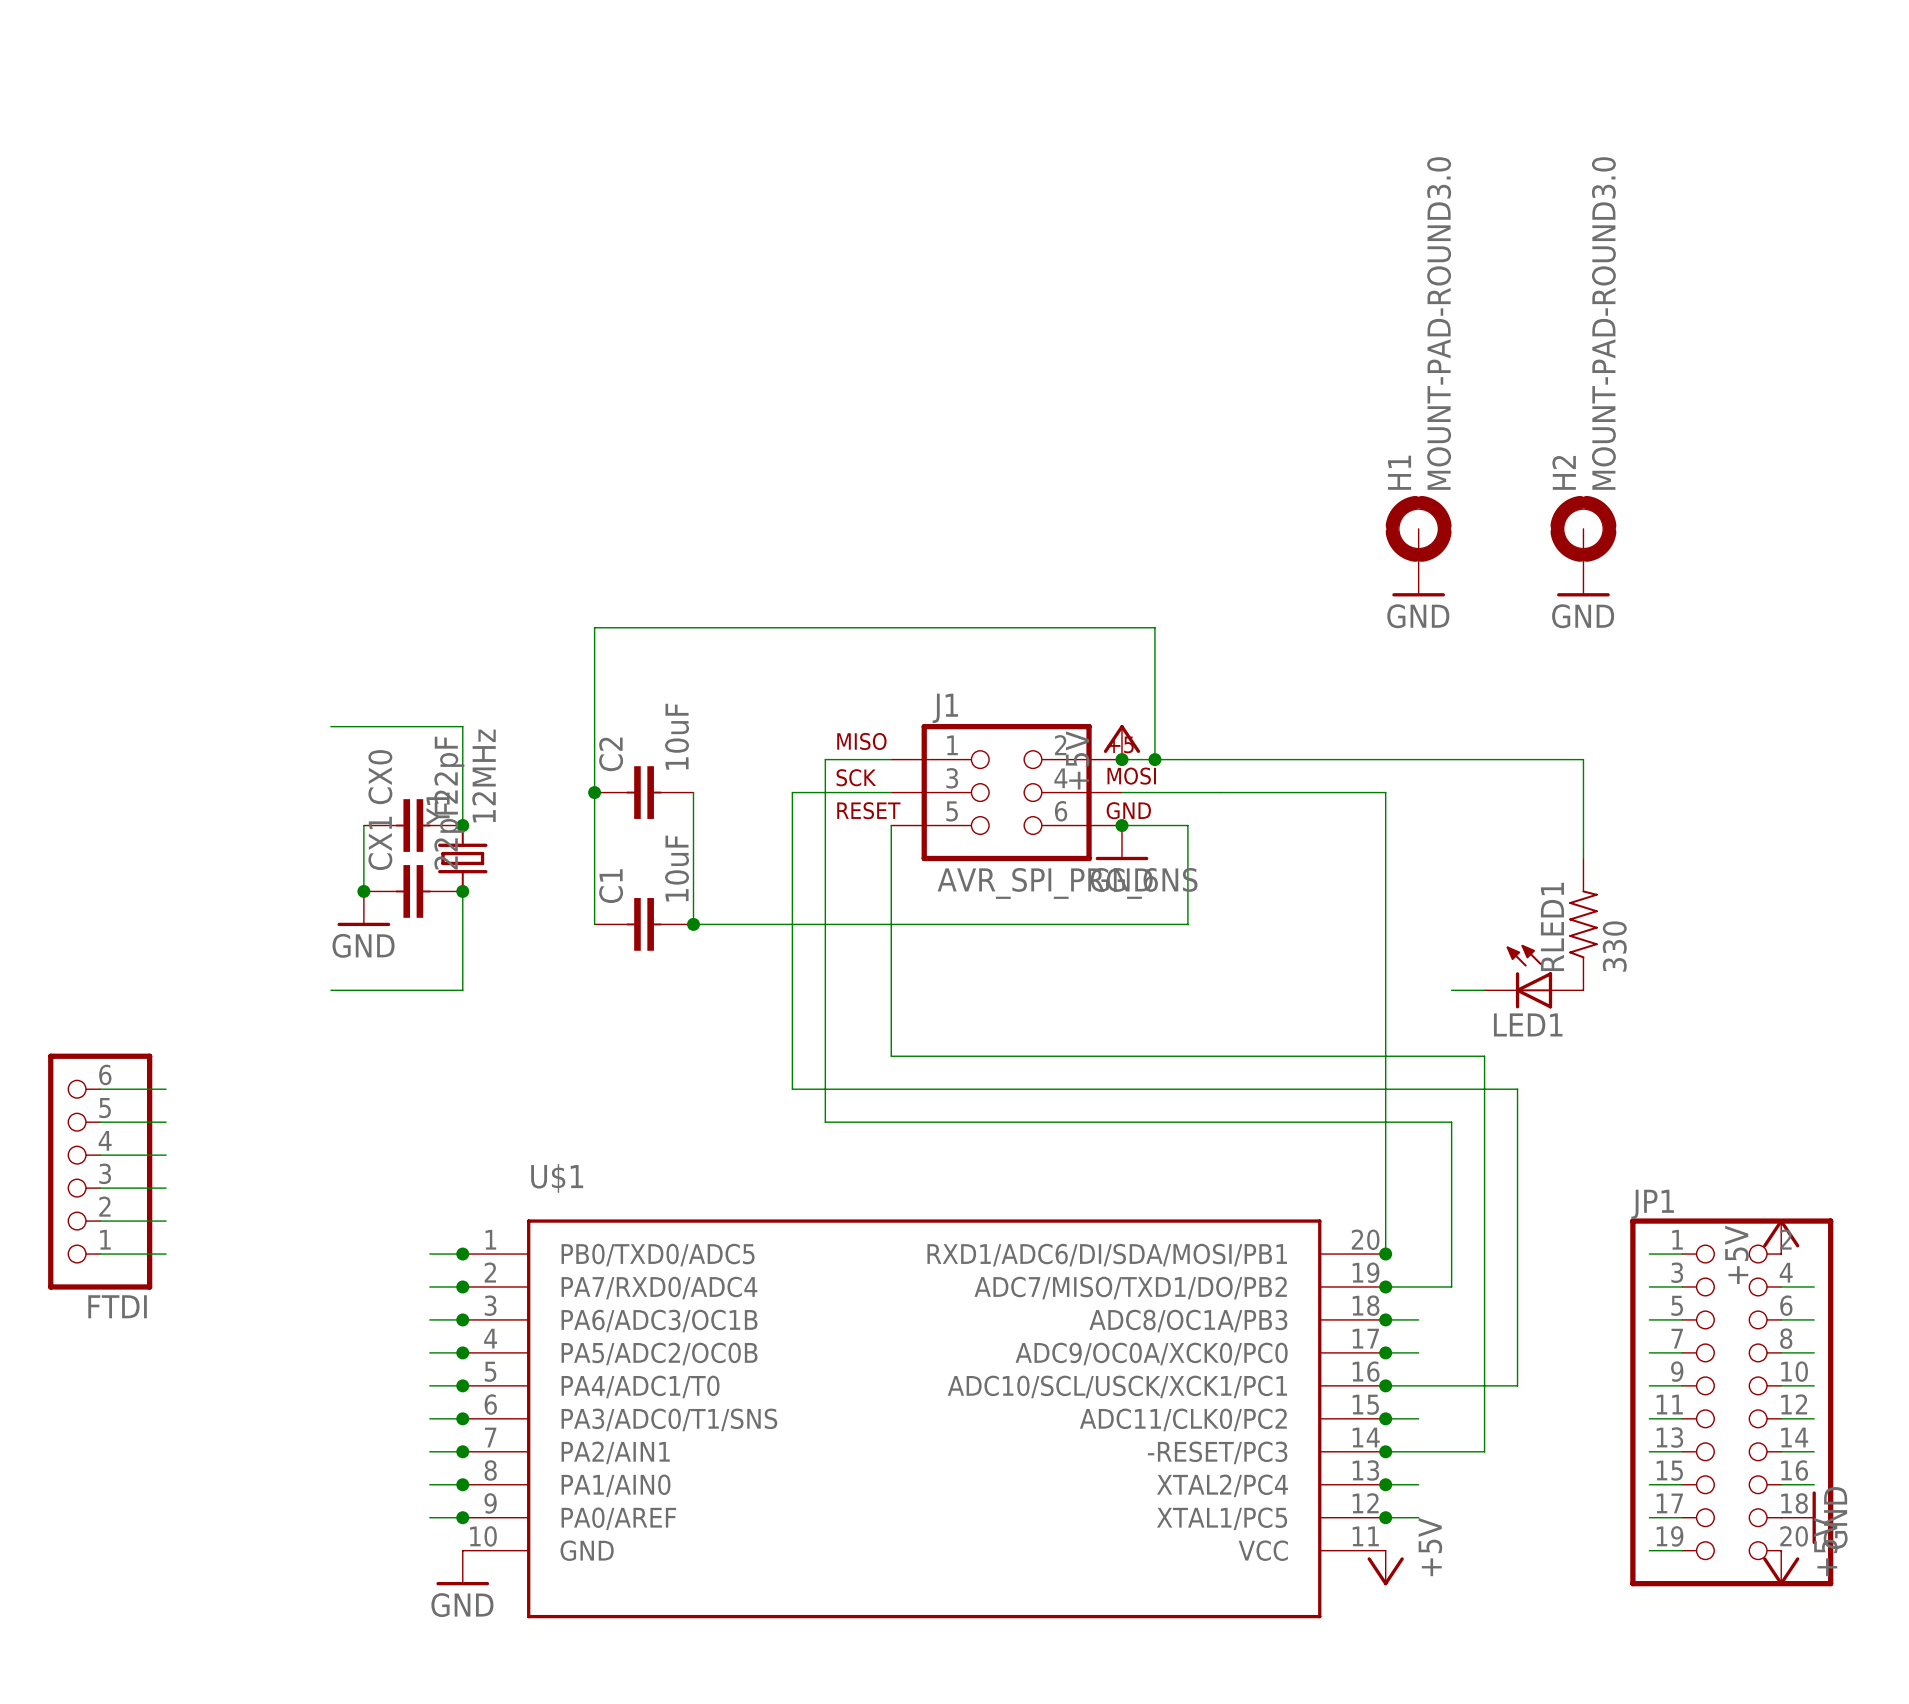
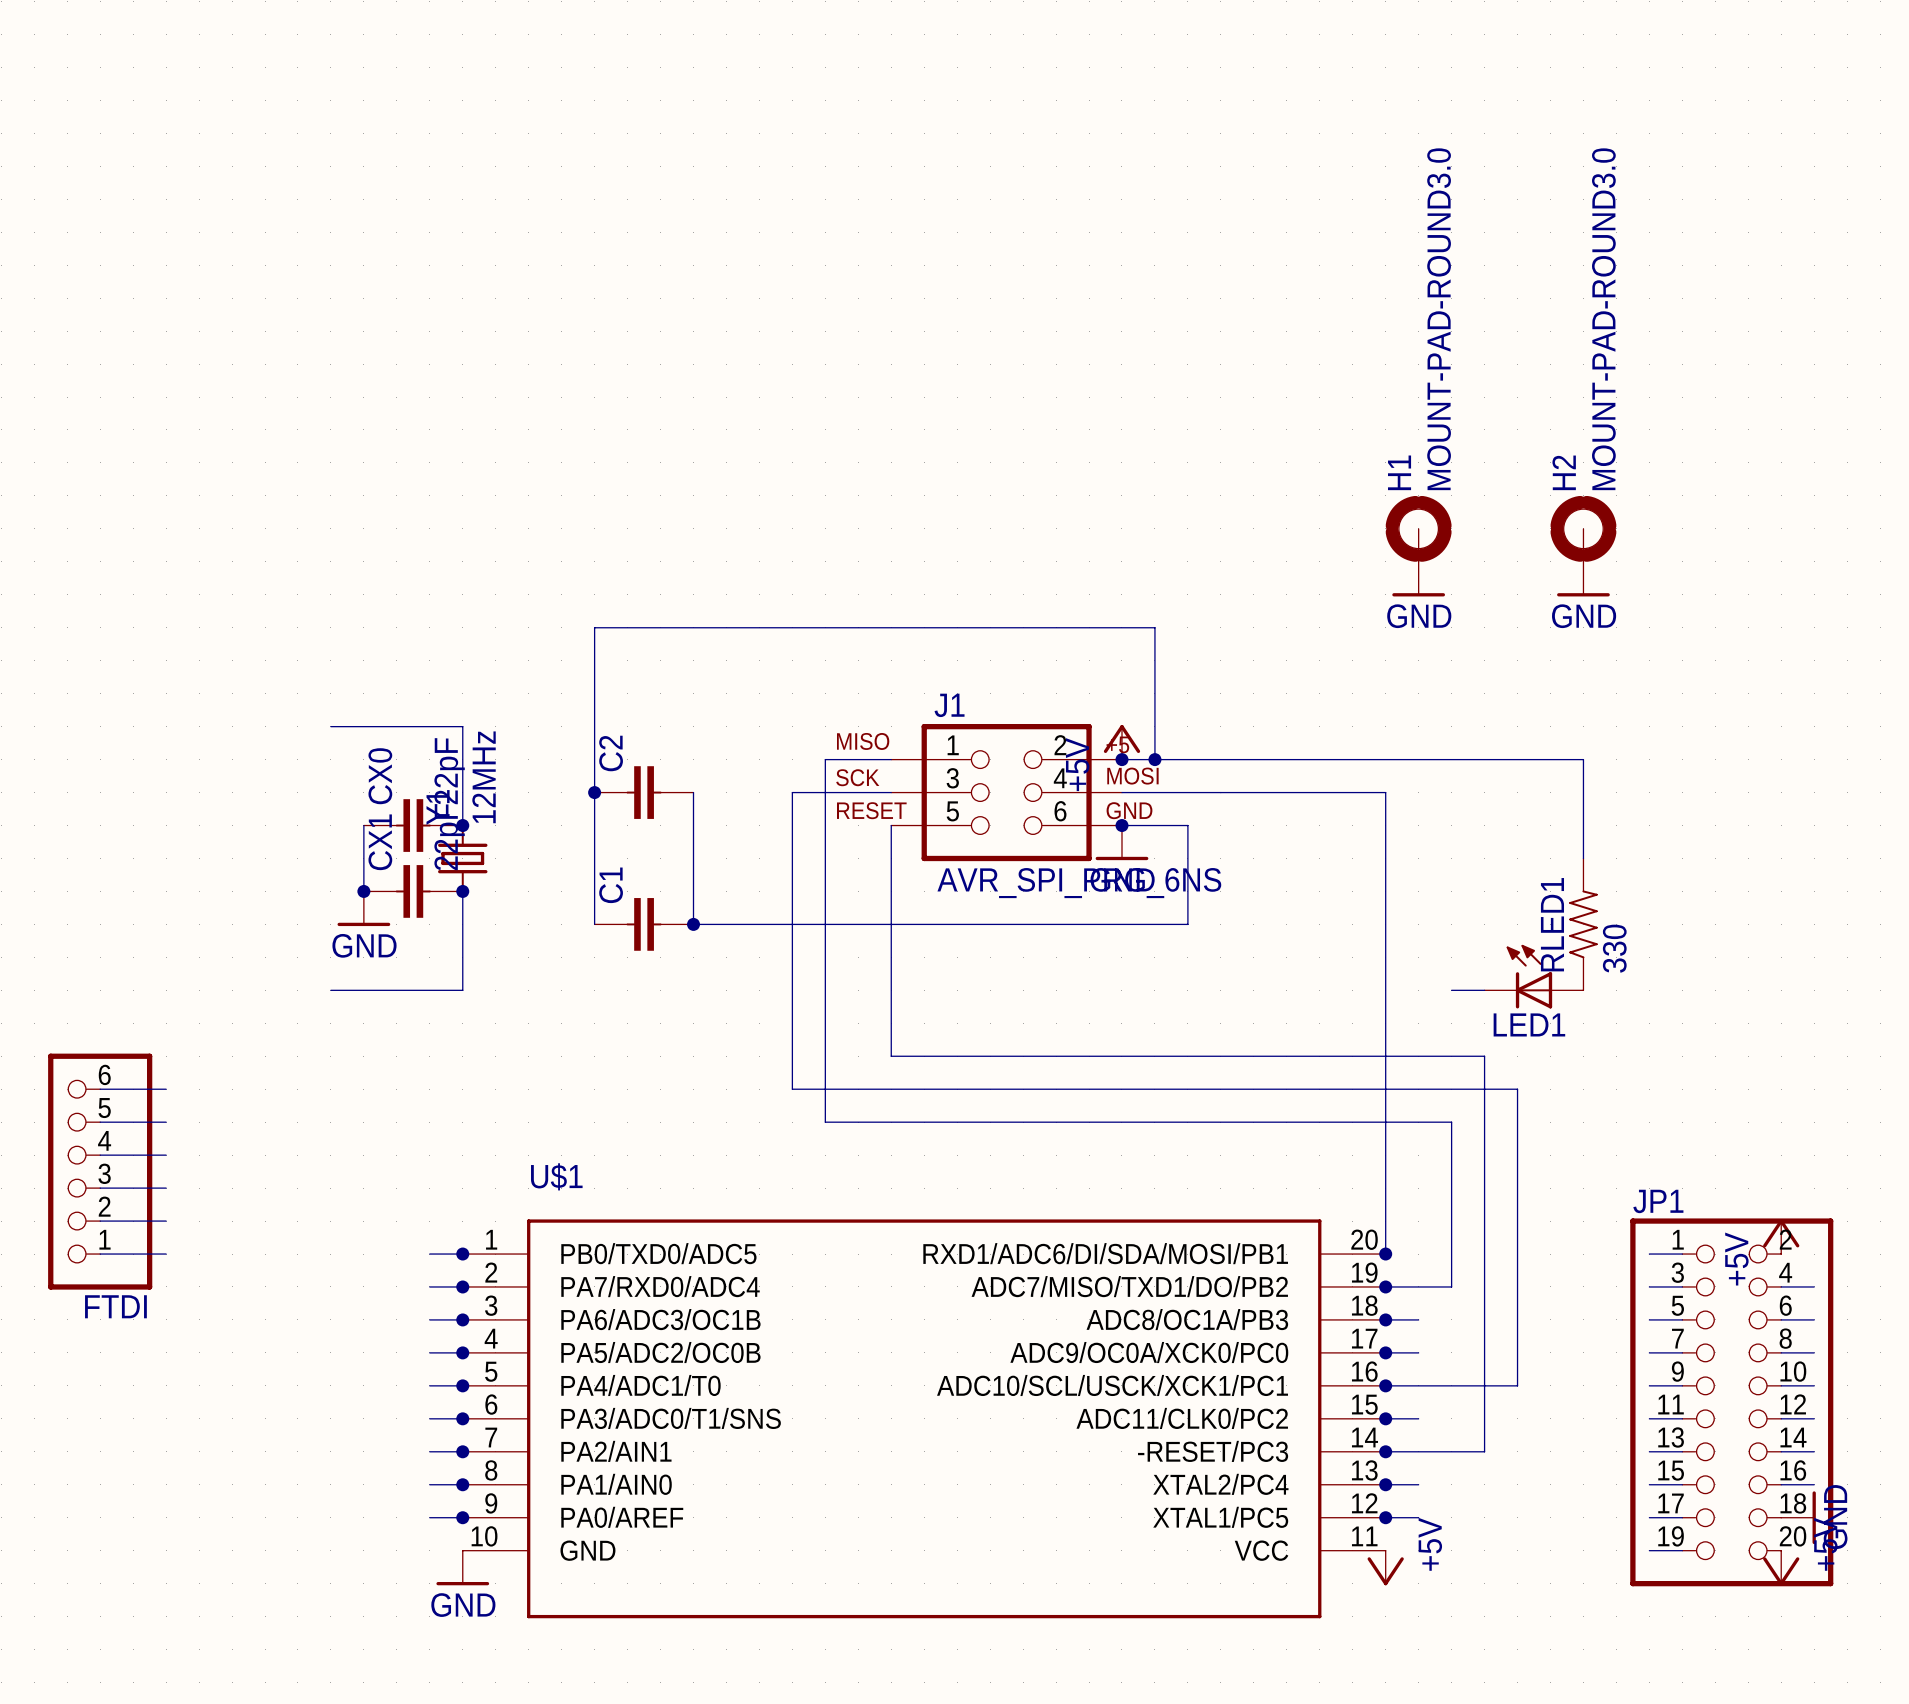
C2 value: 10uF (677, 736) -> none
C1 value: 10uF (677, 868) -> none

